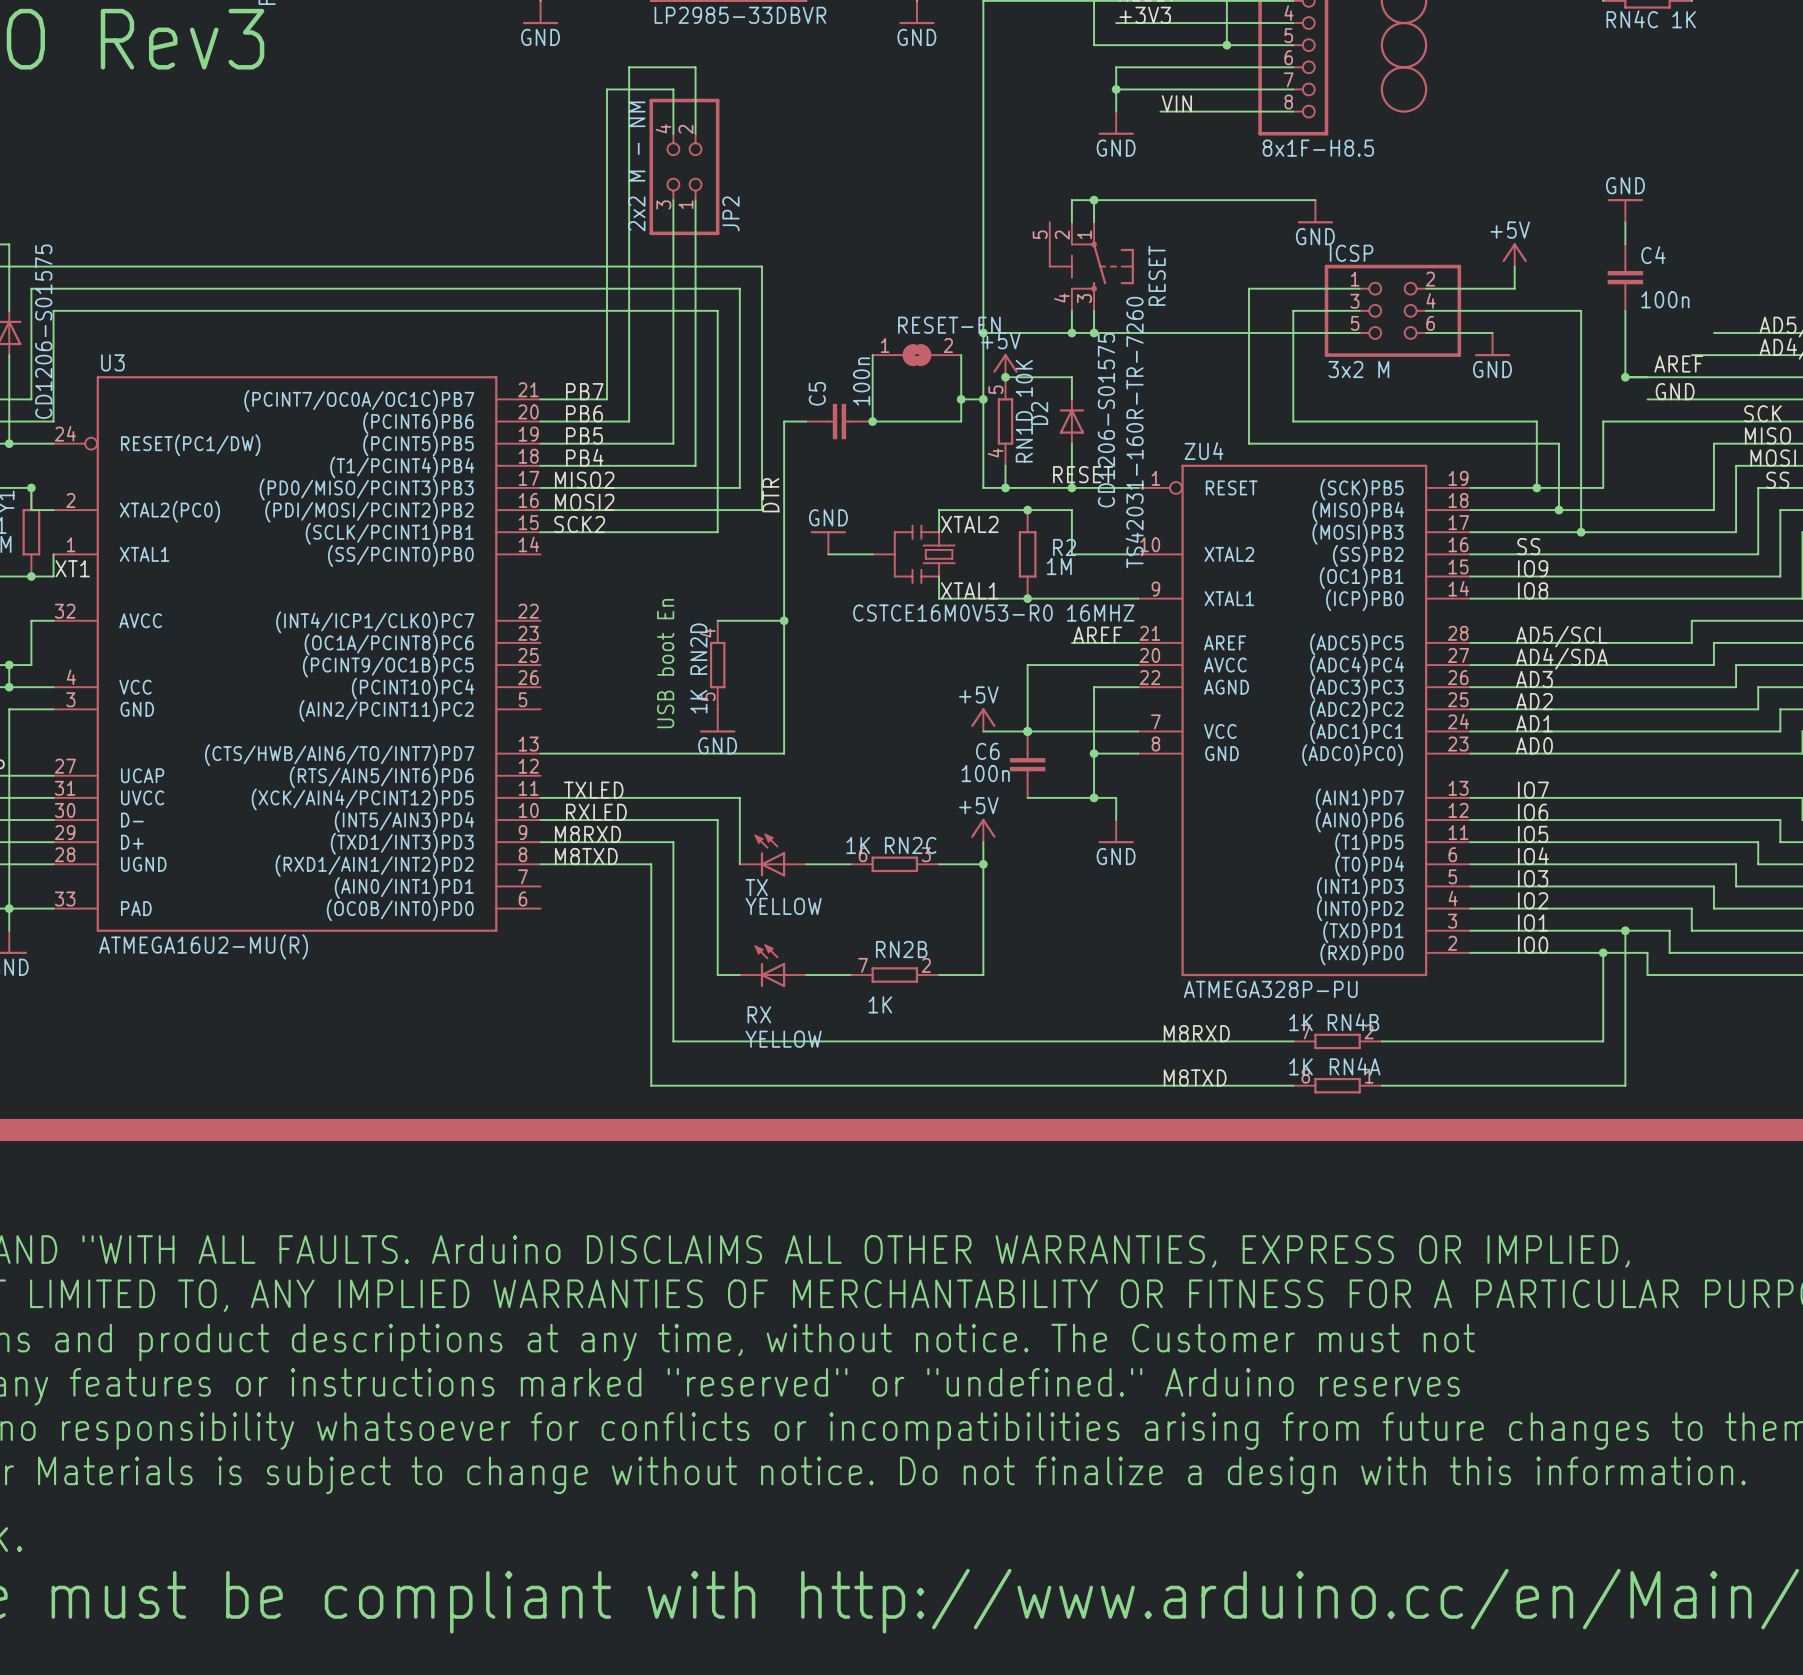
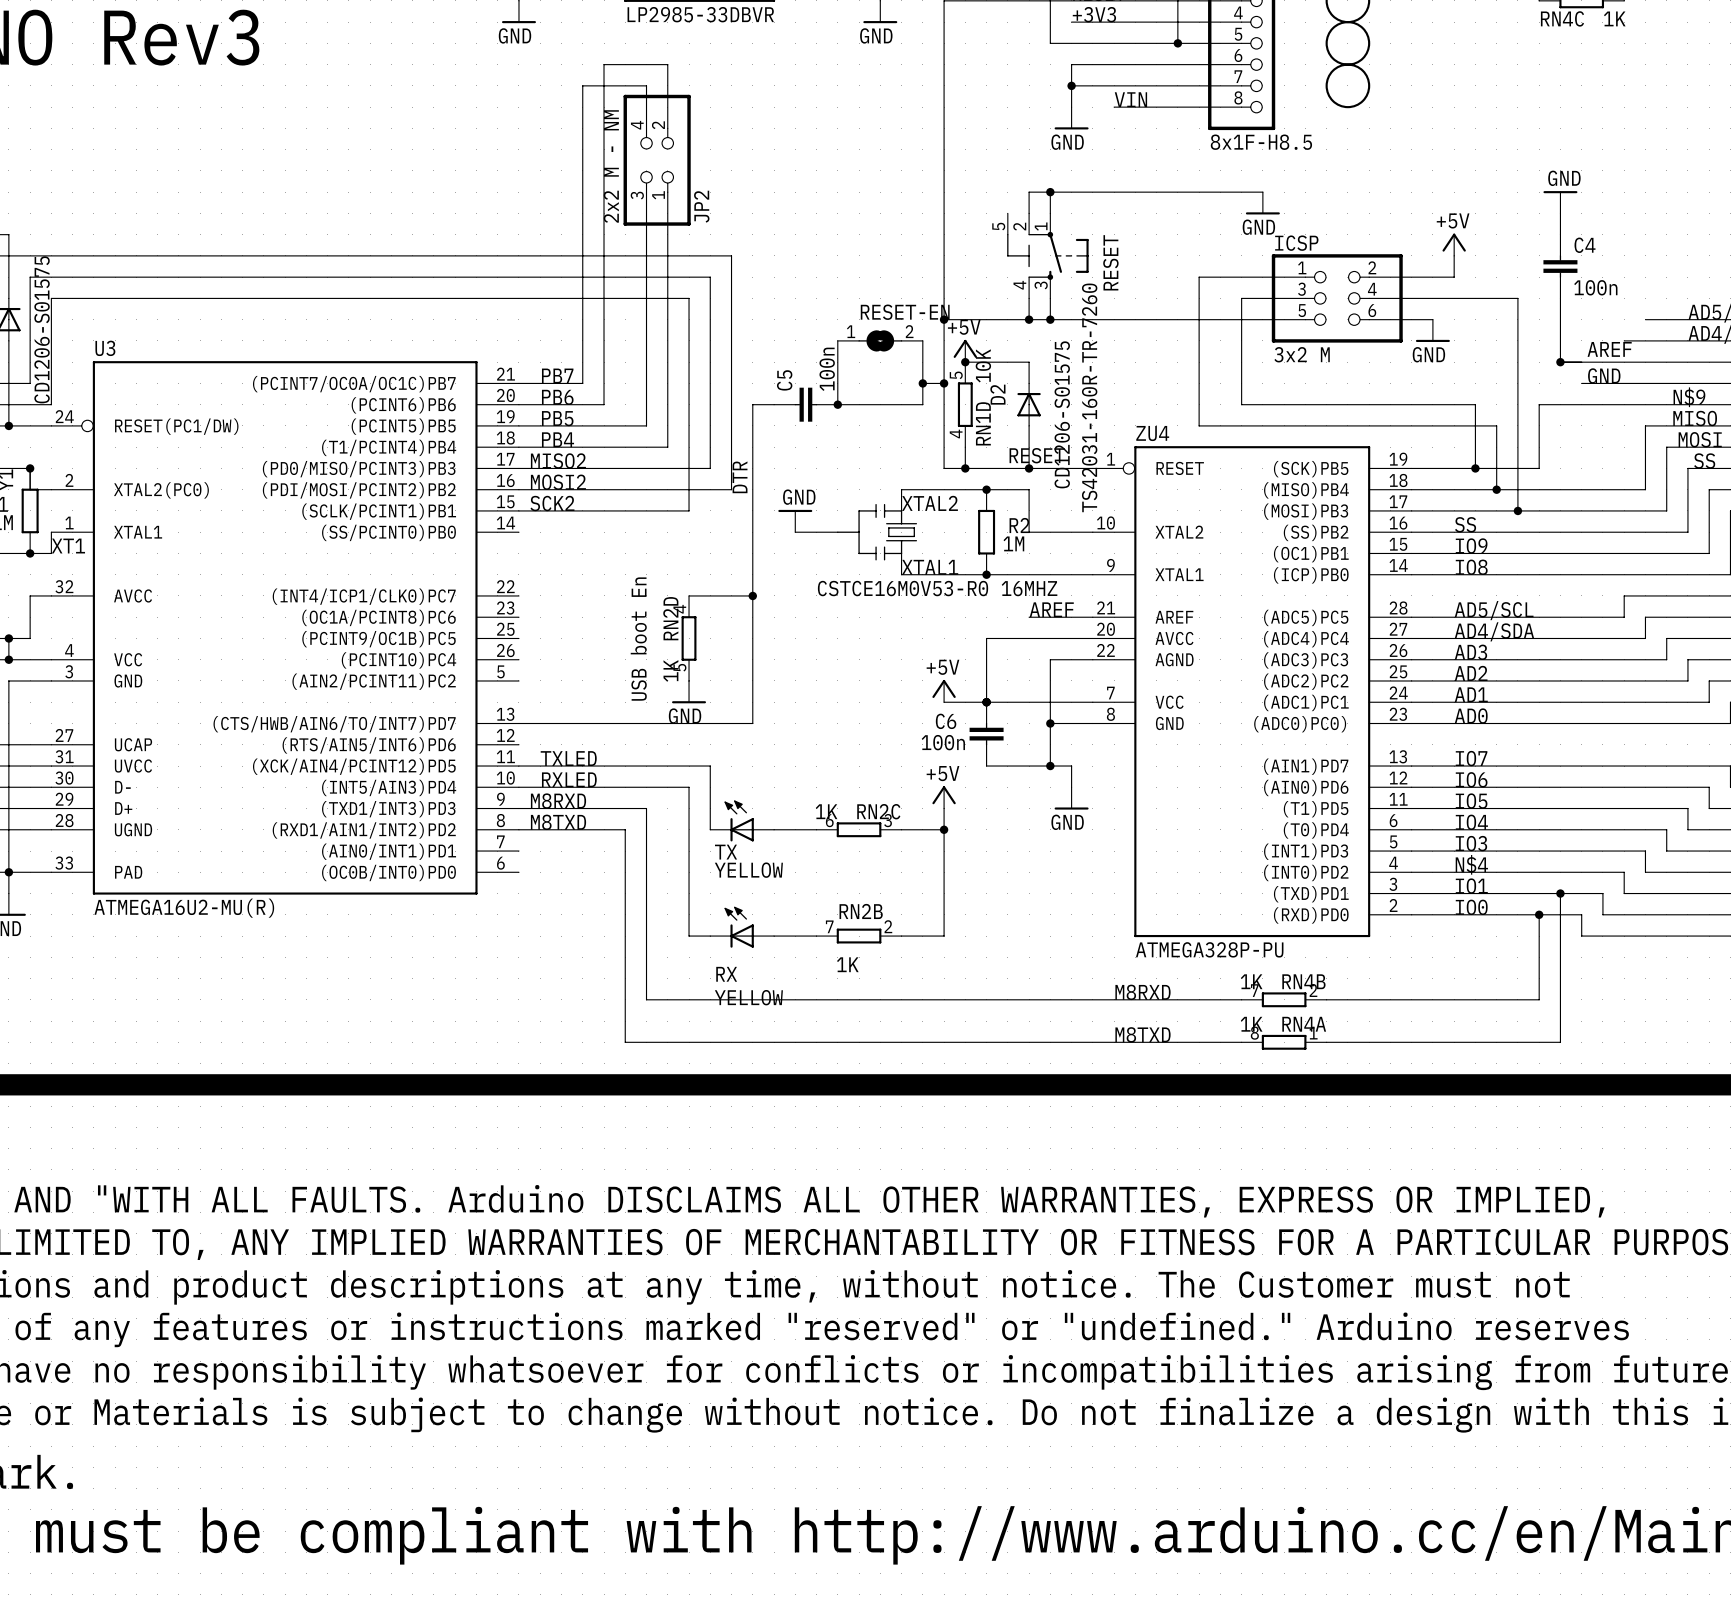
label: SCK (1763, 413) -> N$9 (1689, 397)
label: IO2 (1533, 900) -> N$4 (1471, 864)

